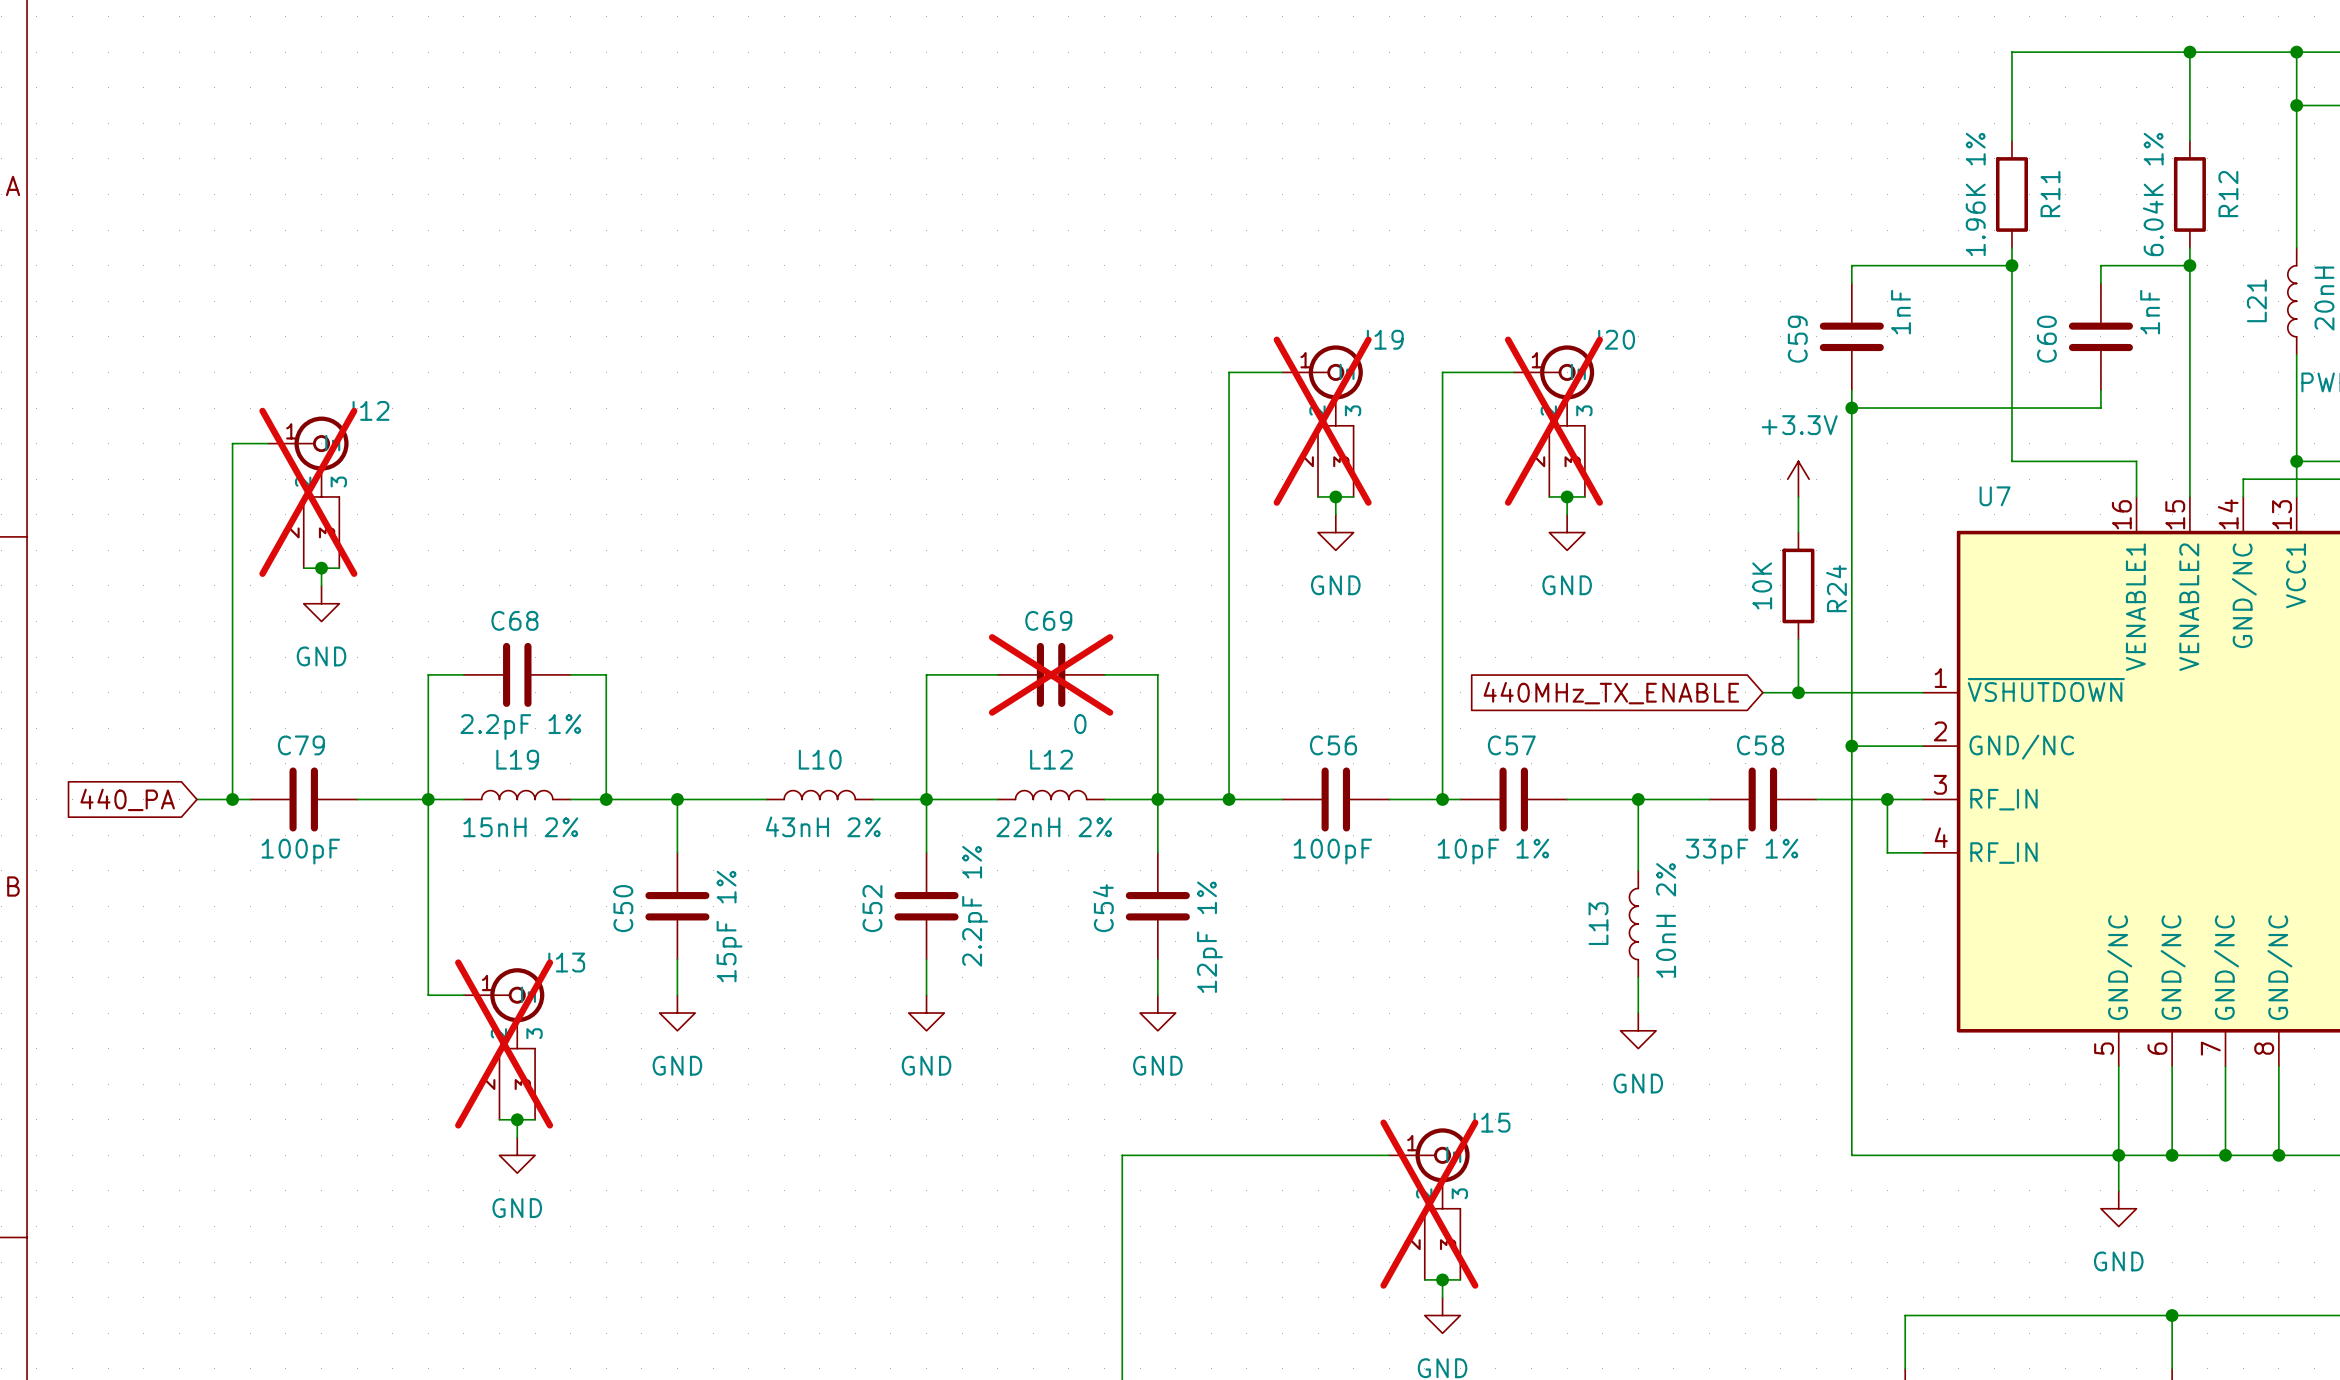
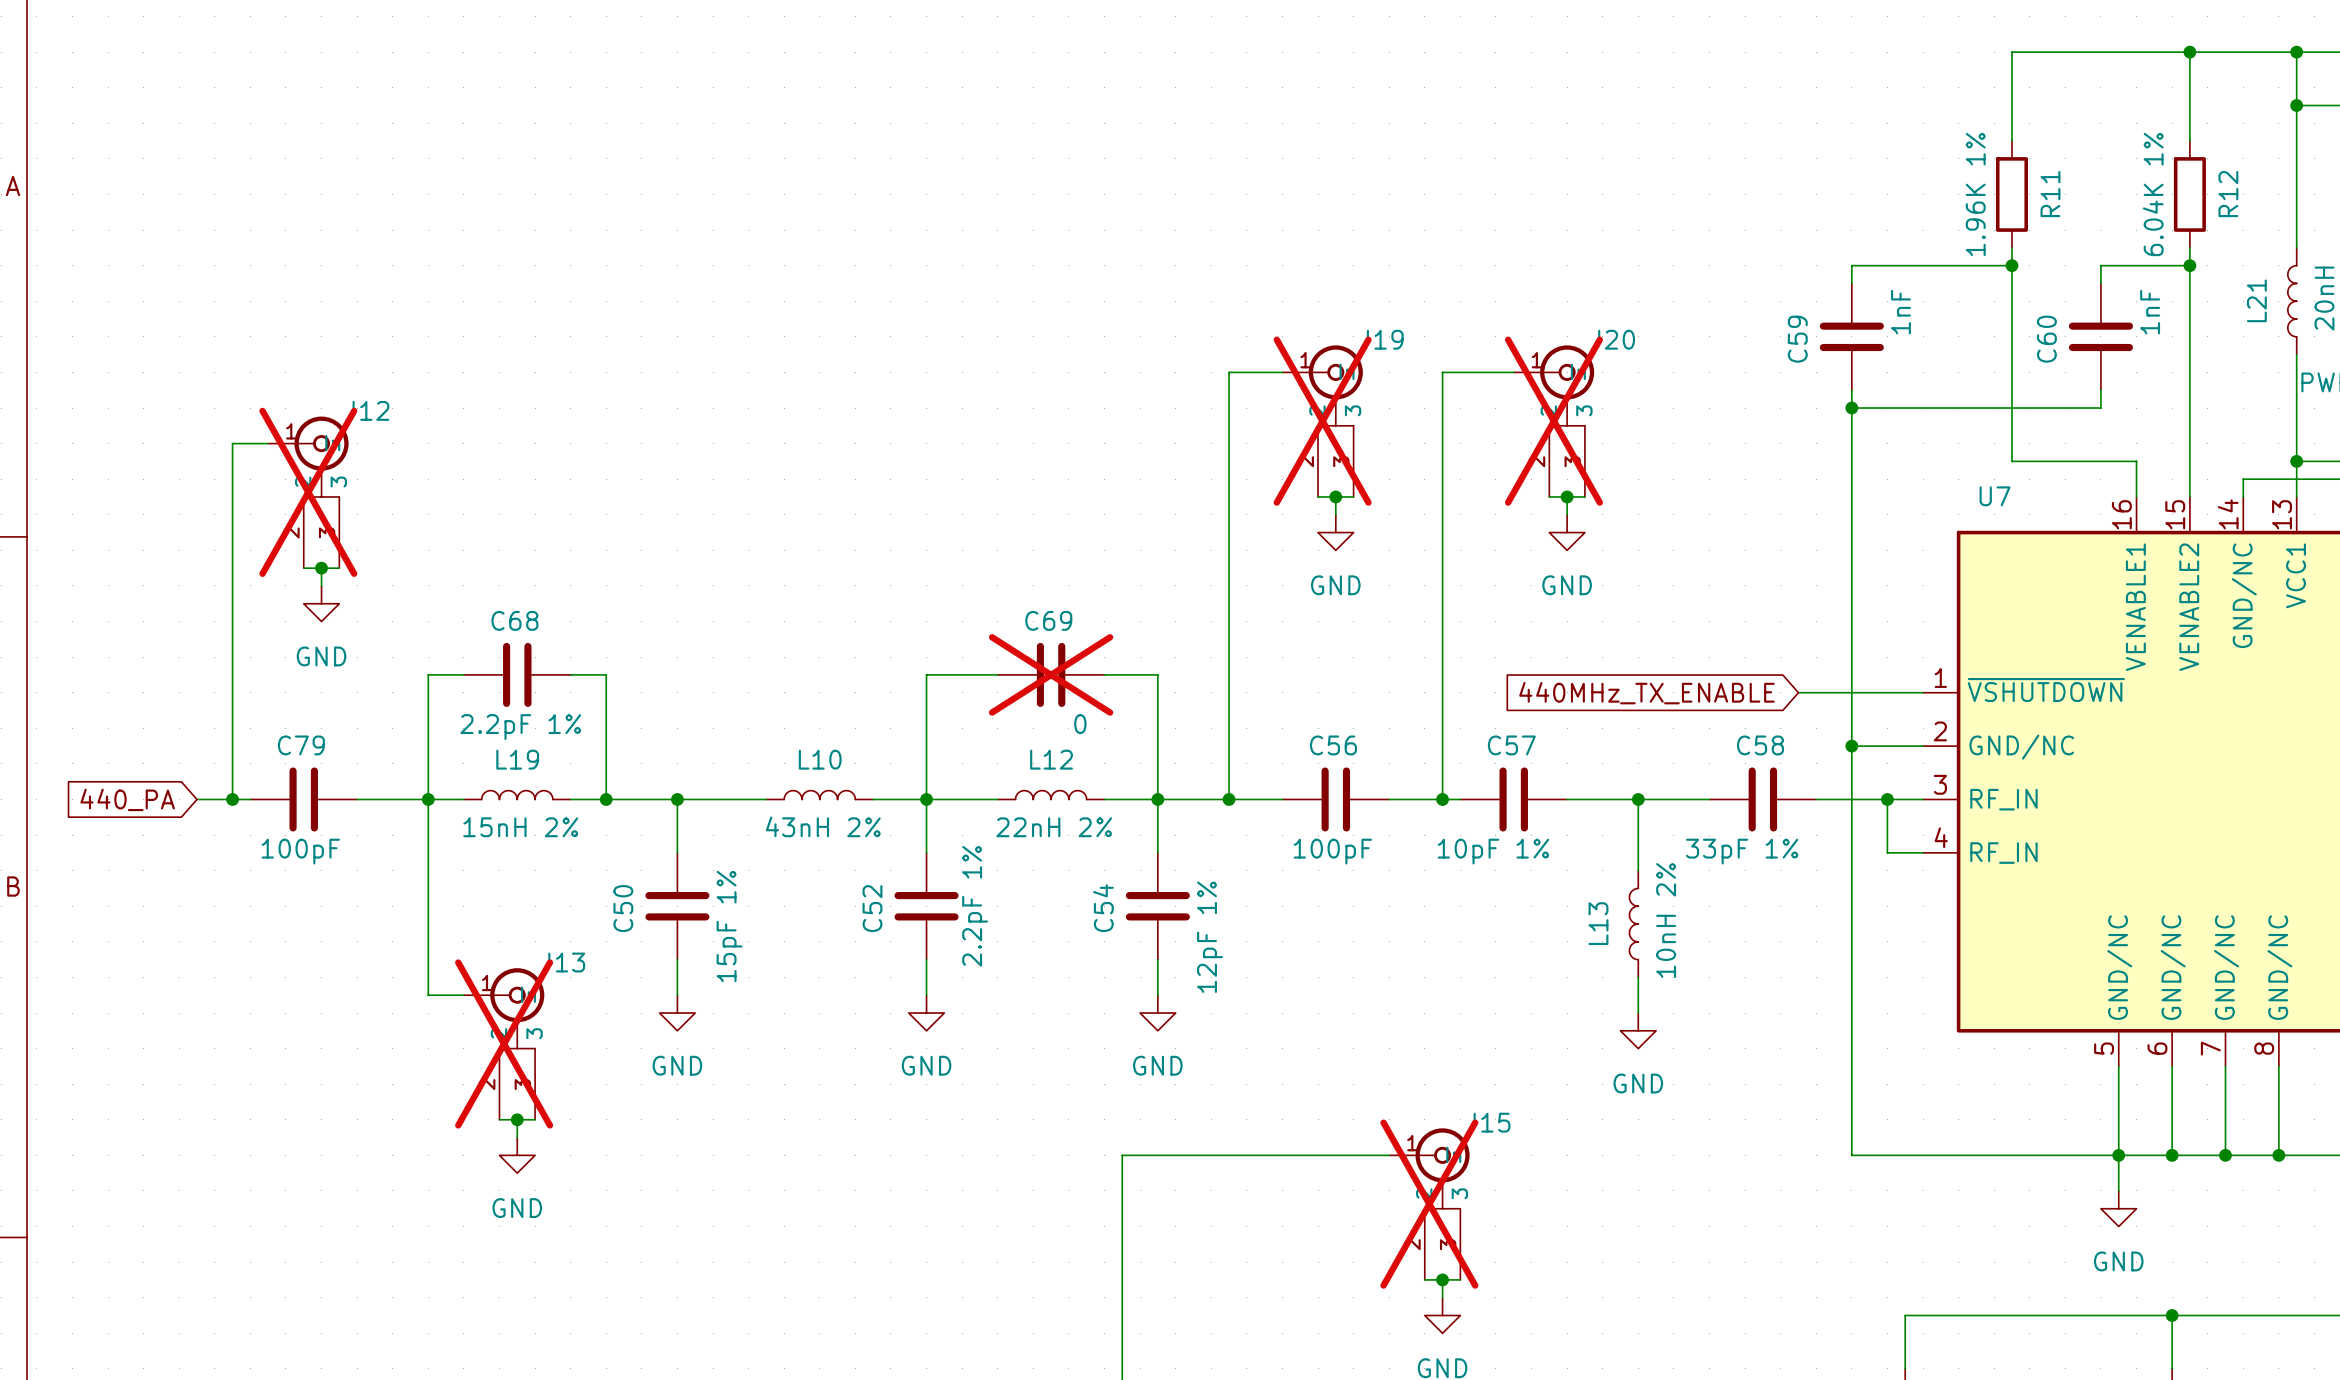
power symbol: +3.3V (1798, 479) -> none
wire: (1798, 496) (1798, 532) -> none
R24: 10K (1798, 585) -> none
wire: (1798, 639) (1798, 692) (1762, 692) -> none
junction: (1798, 692) -> none
global label position: 440MHz_TX_ENABLE (1611, 693) -> 440MHz_TX_ENABLE (1646, 693)

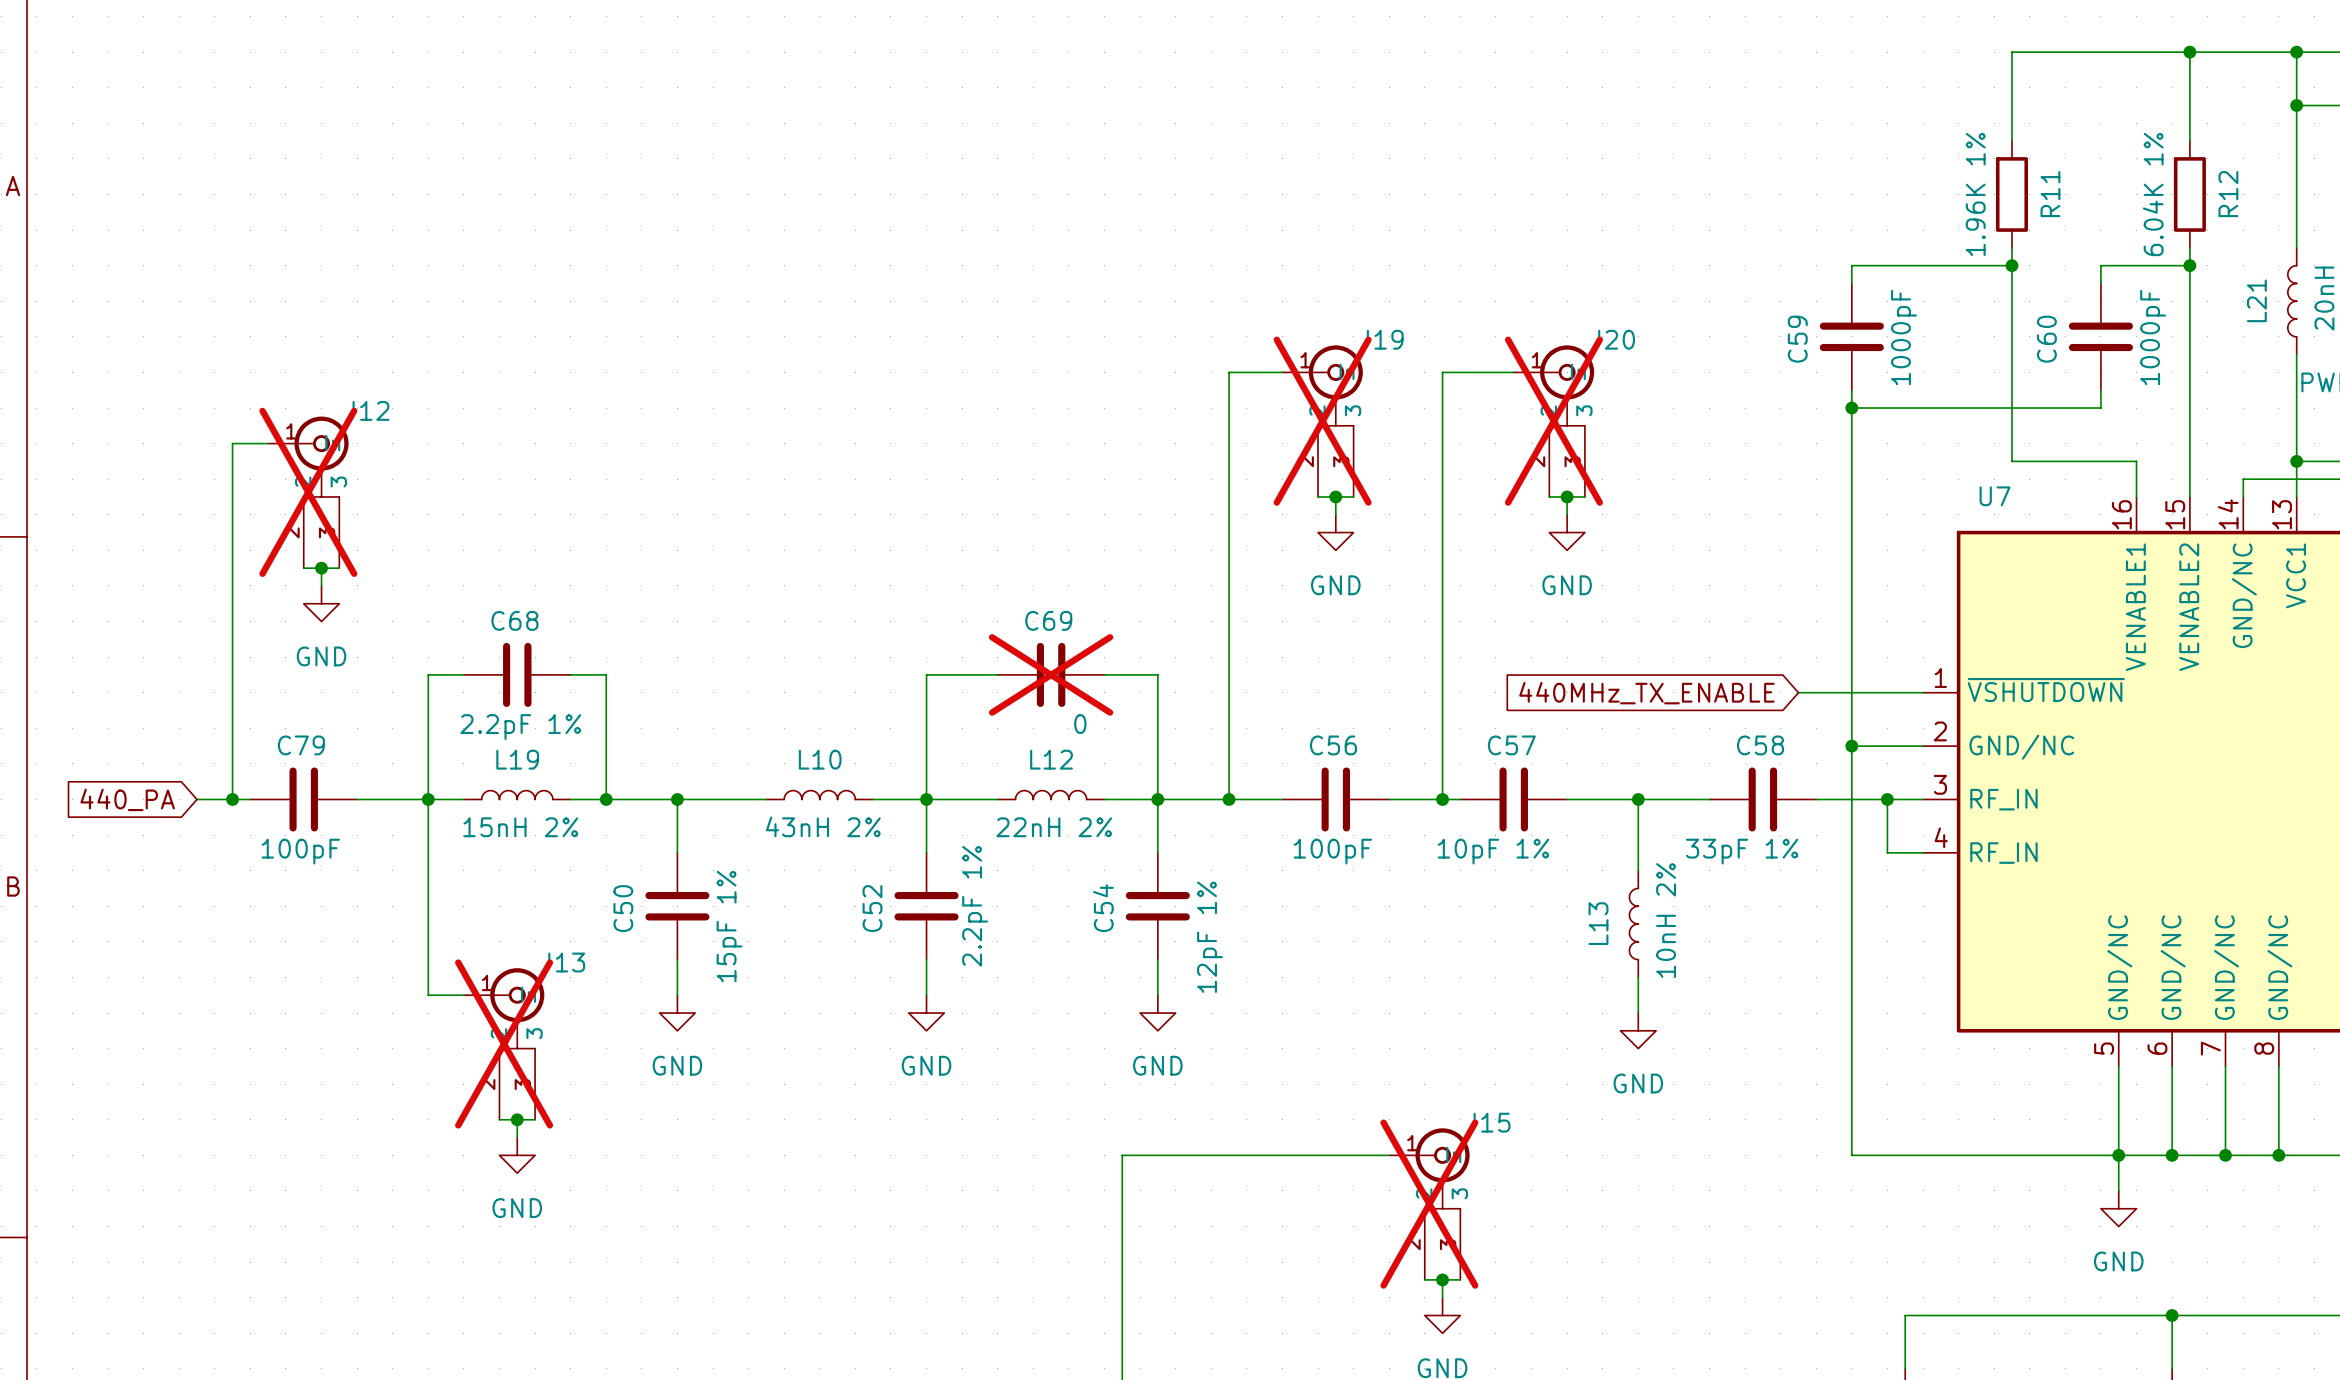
C59 value: 1nF (1900, 312) -> 1000pF (1903, 337)
C60 value: 1nF (2150, 312) -> 1000pF (2153, 337)

